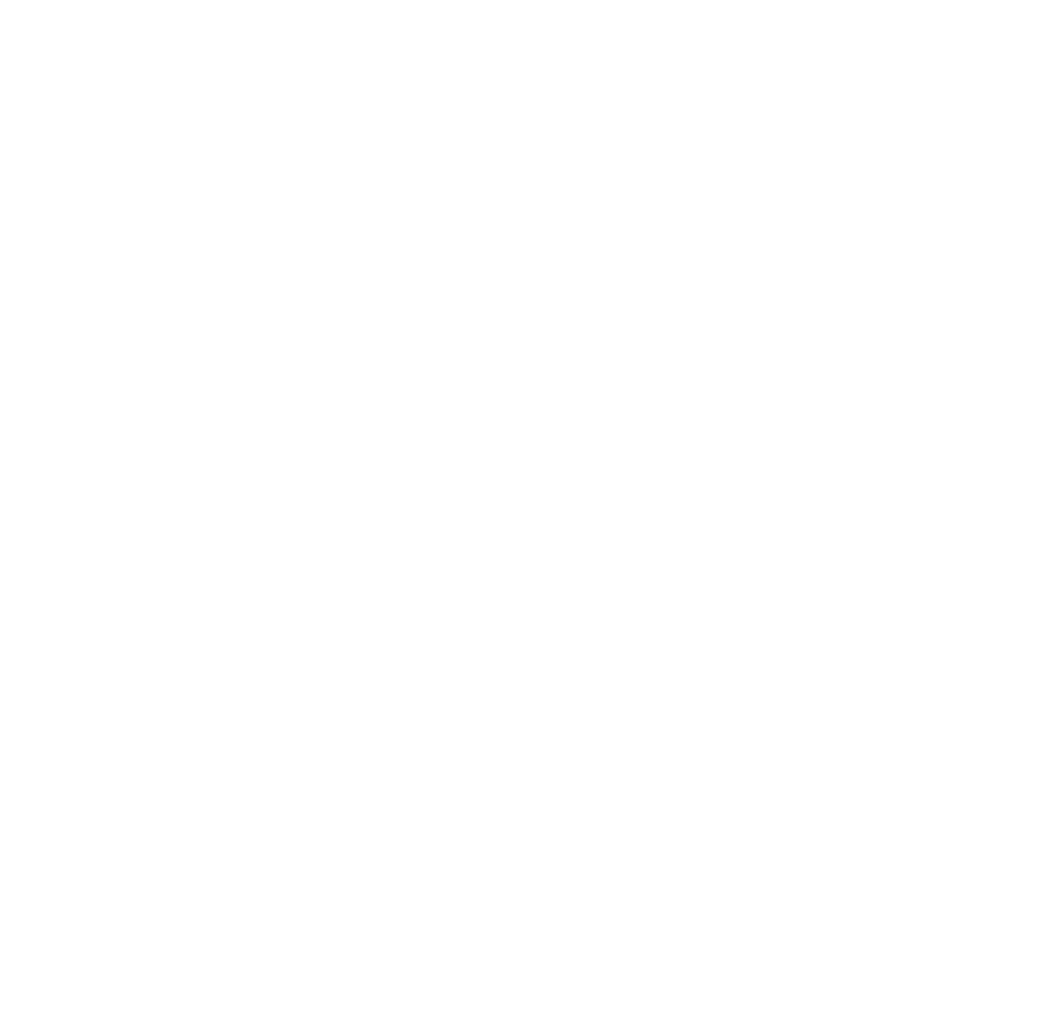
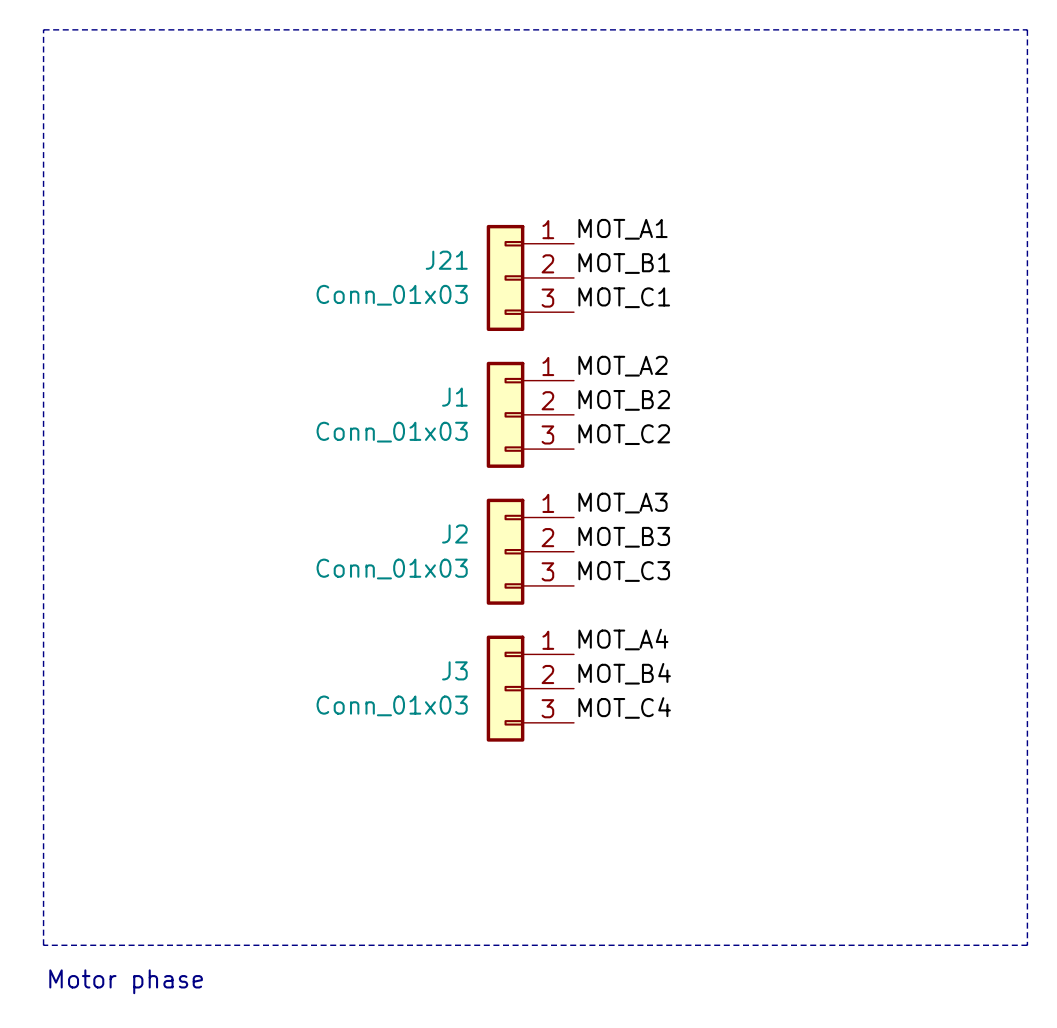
line: none -> (43, 29) (1027, 29) (1027, 945) (43, 945) (43, 29)
label: none -> MOT_A1 (622, 229)
label: none -> MOT_B1 (624, 263)
J21: none -> Conn_01x03 (530, 277)
label: none -> MOT_C1 (624, 297)
label: none -> MOT_A2 (622, 366)
label: none -> MOT_B2 (624, 400)
J1: none -> Conn_01x03 (530, 414)
label: none -> MOT_C2 (624, 434)
label: none -> MOT_A3 (622, 503)
label: none -> MOT_B3 (624, 537)
J2: none -> Conn_01x03 (530, 551)
label: none -> MOT_C3 (624, 571)
label: none -> MOT_A4 (623, 639)
label: none -> MOT_B4 (624, 673)
J3: none -> Conn_01x03 (530, 688)
label: none -> MOT_C4 (624, 707)
text: none -> Motor phase (126, 981)

